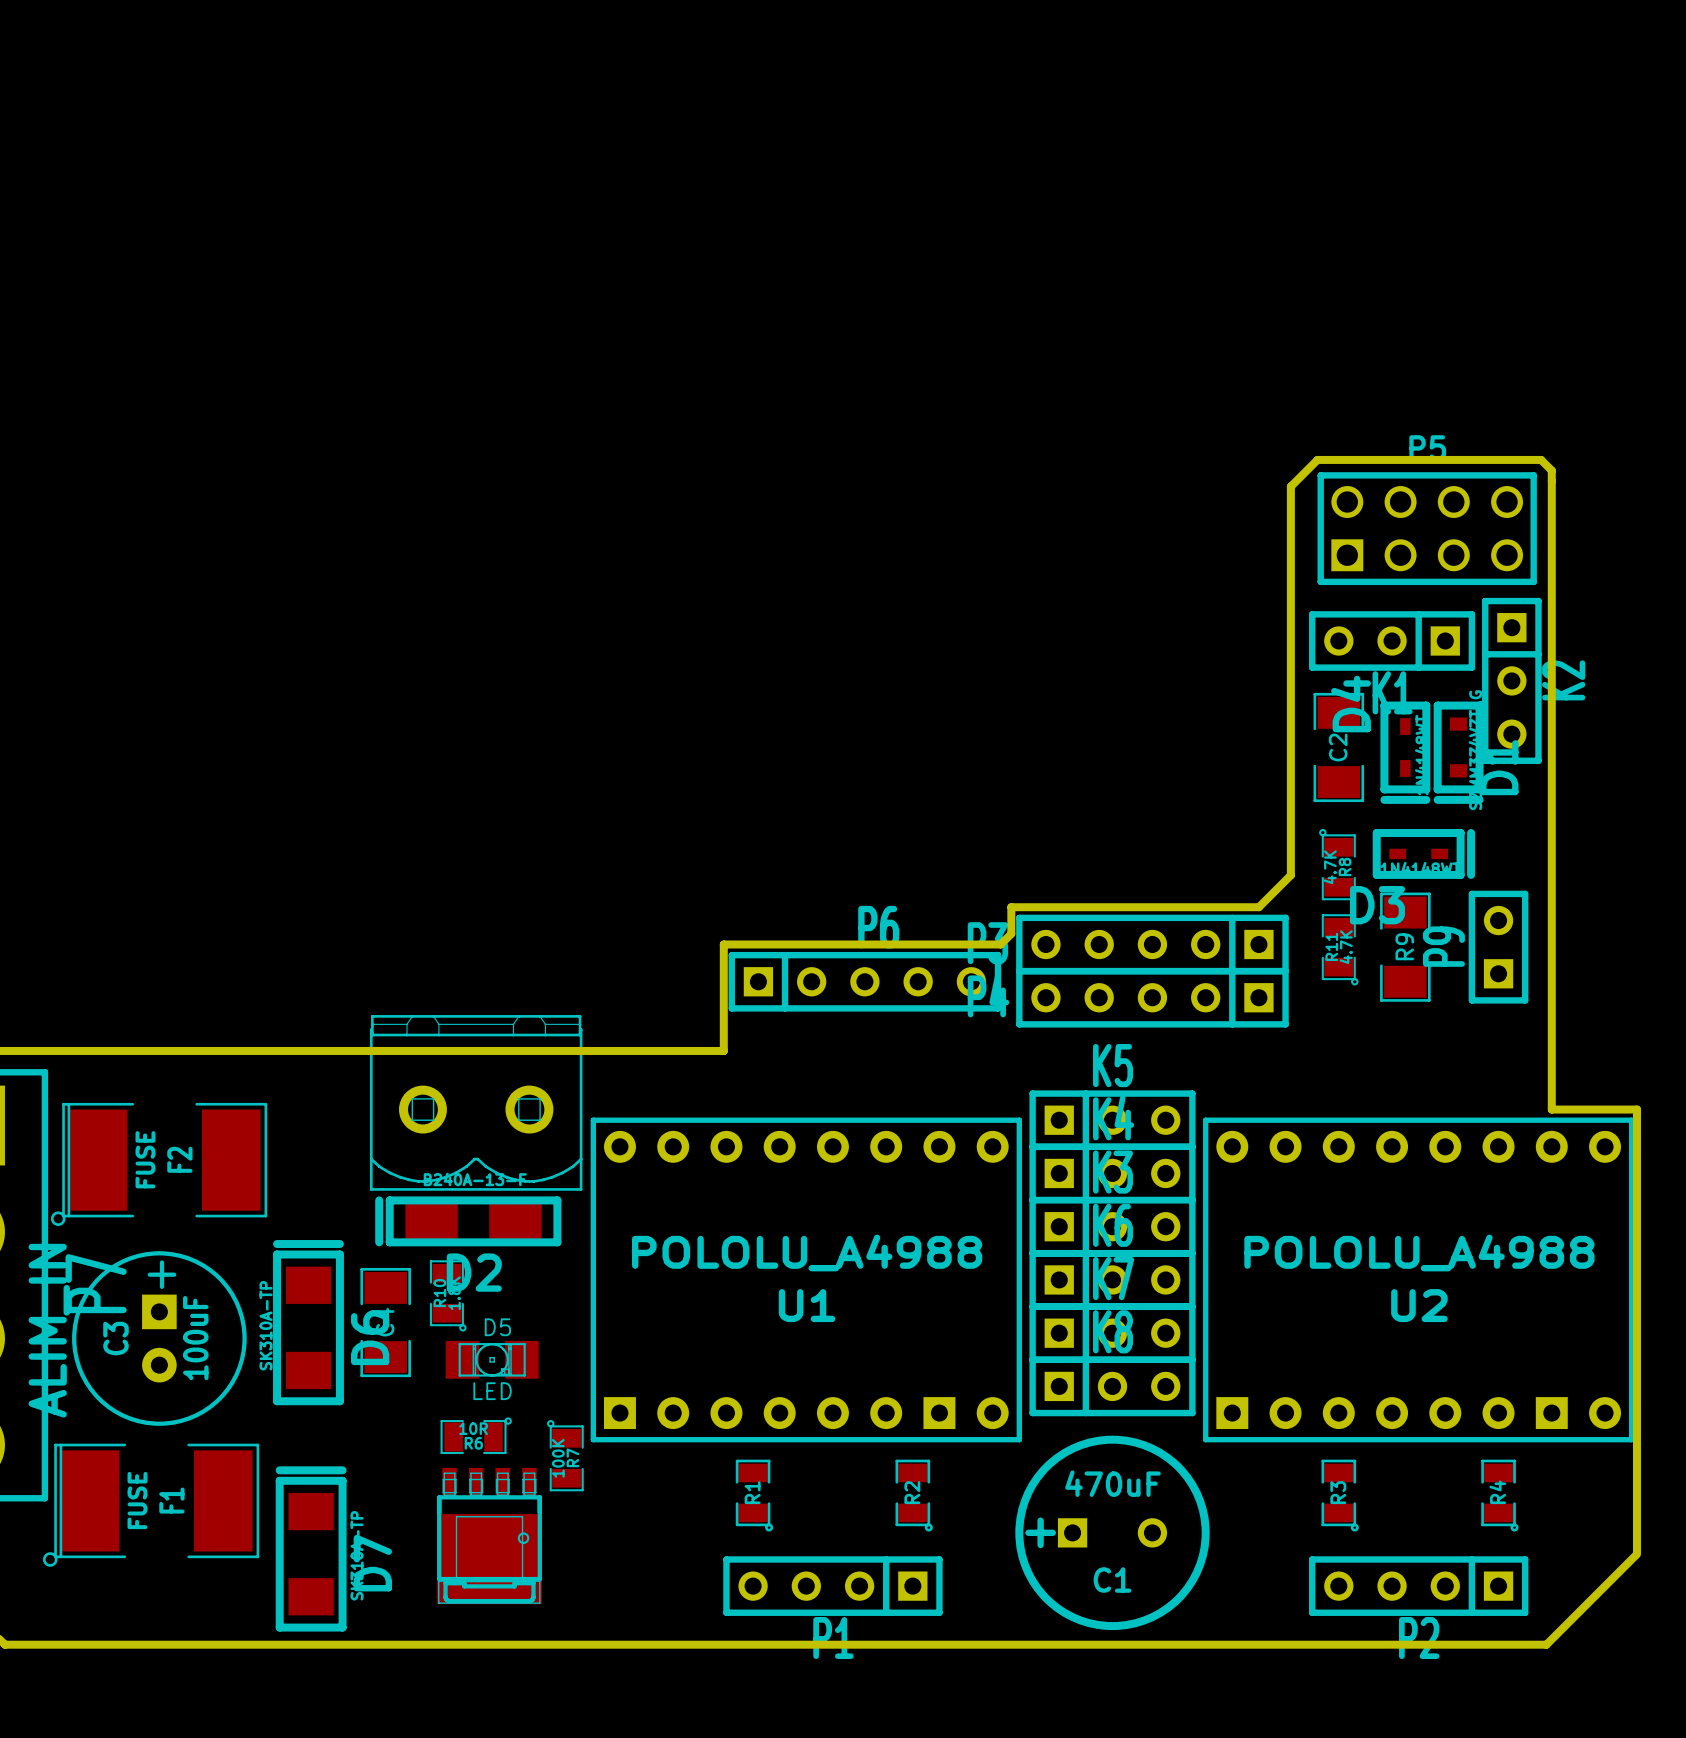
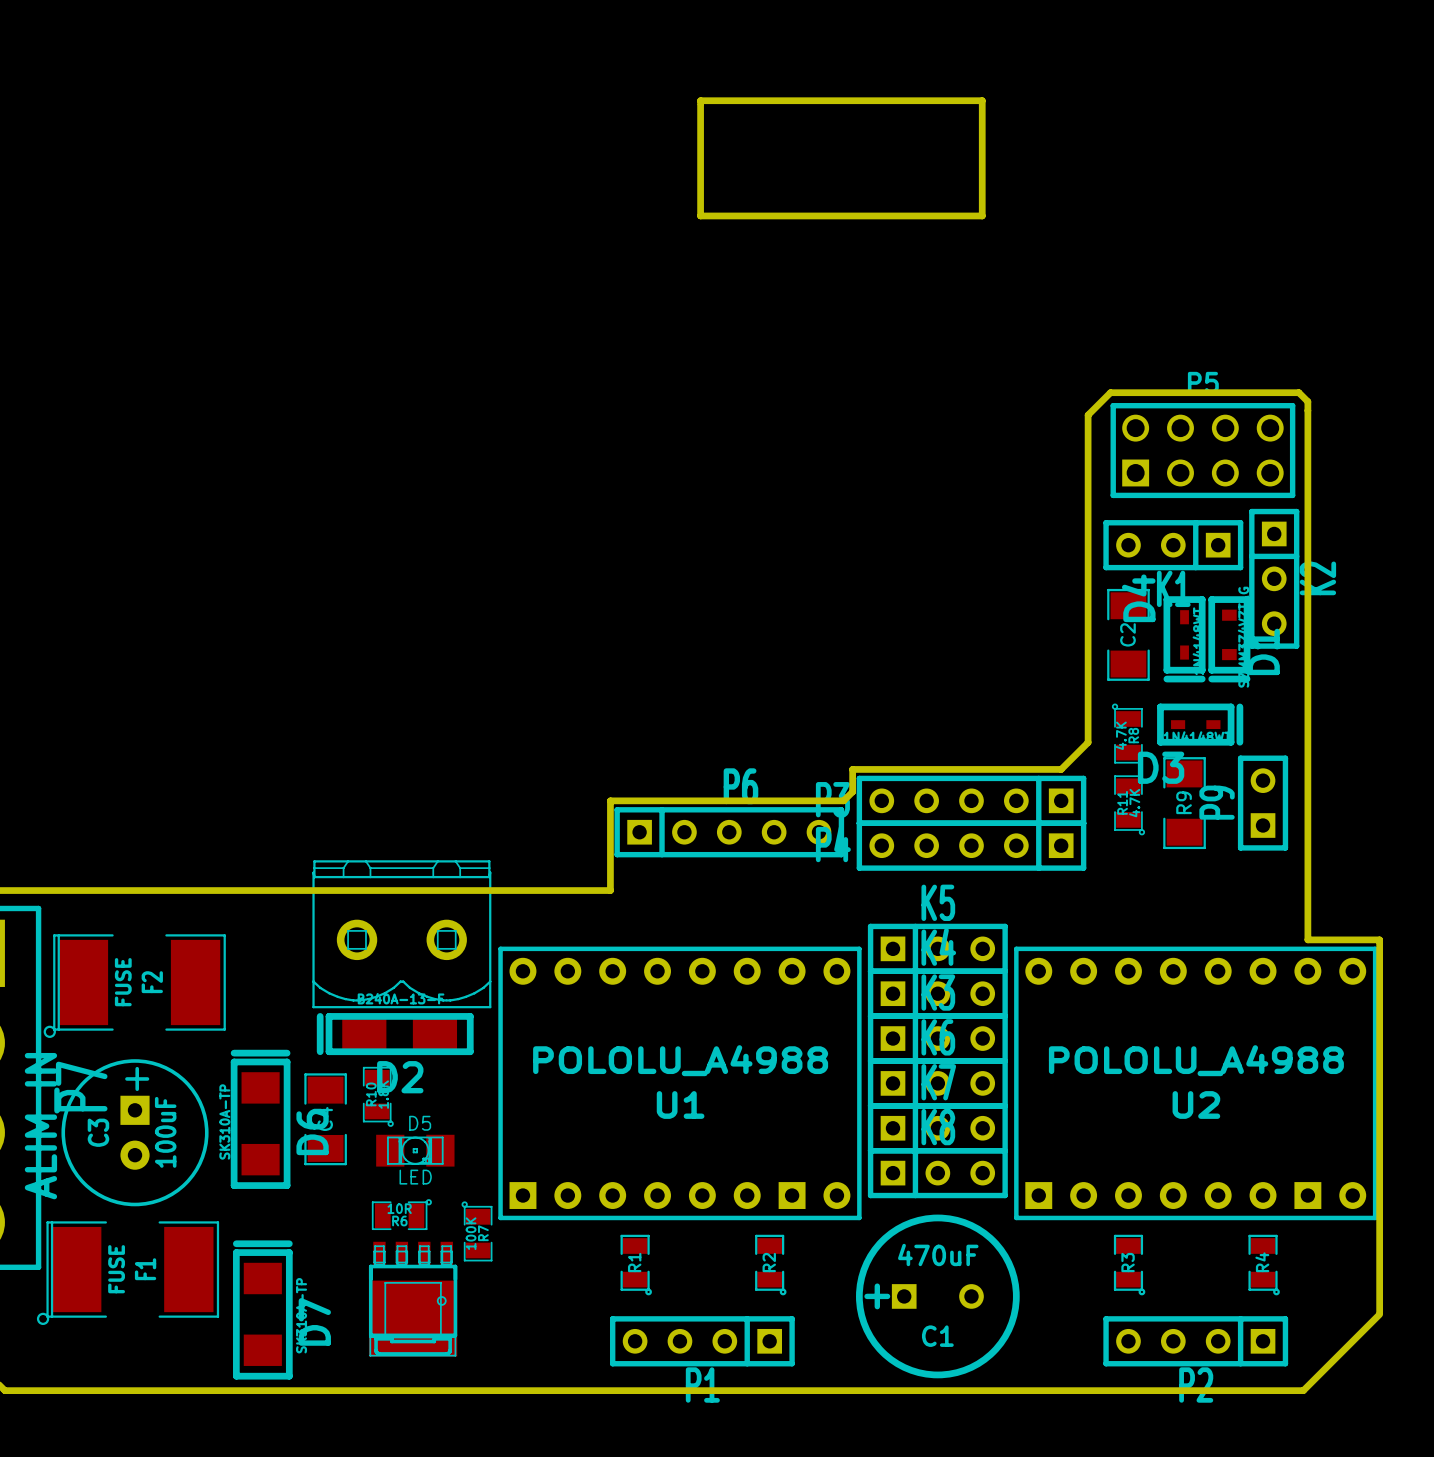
board edge: none -> (700, 103) (700, 100) (982, 100) (982, 215) (700, 215) (700, 105)

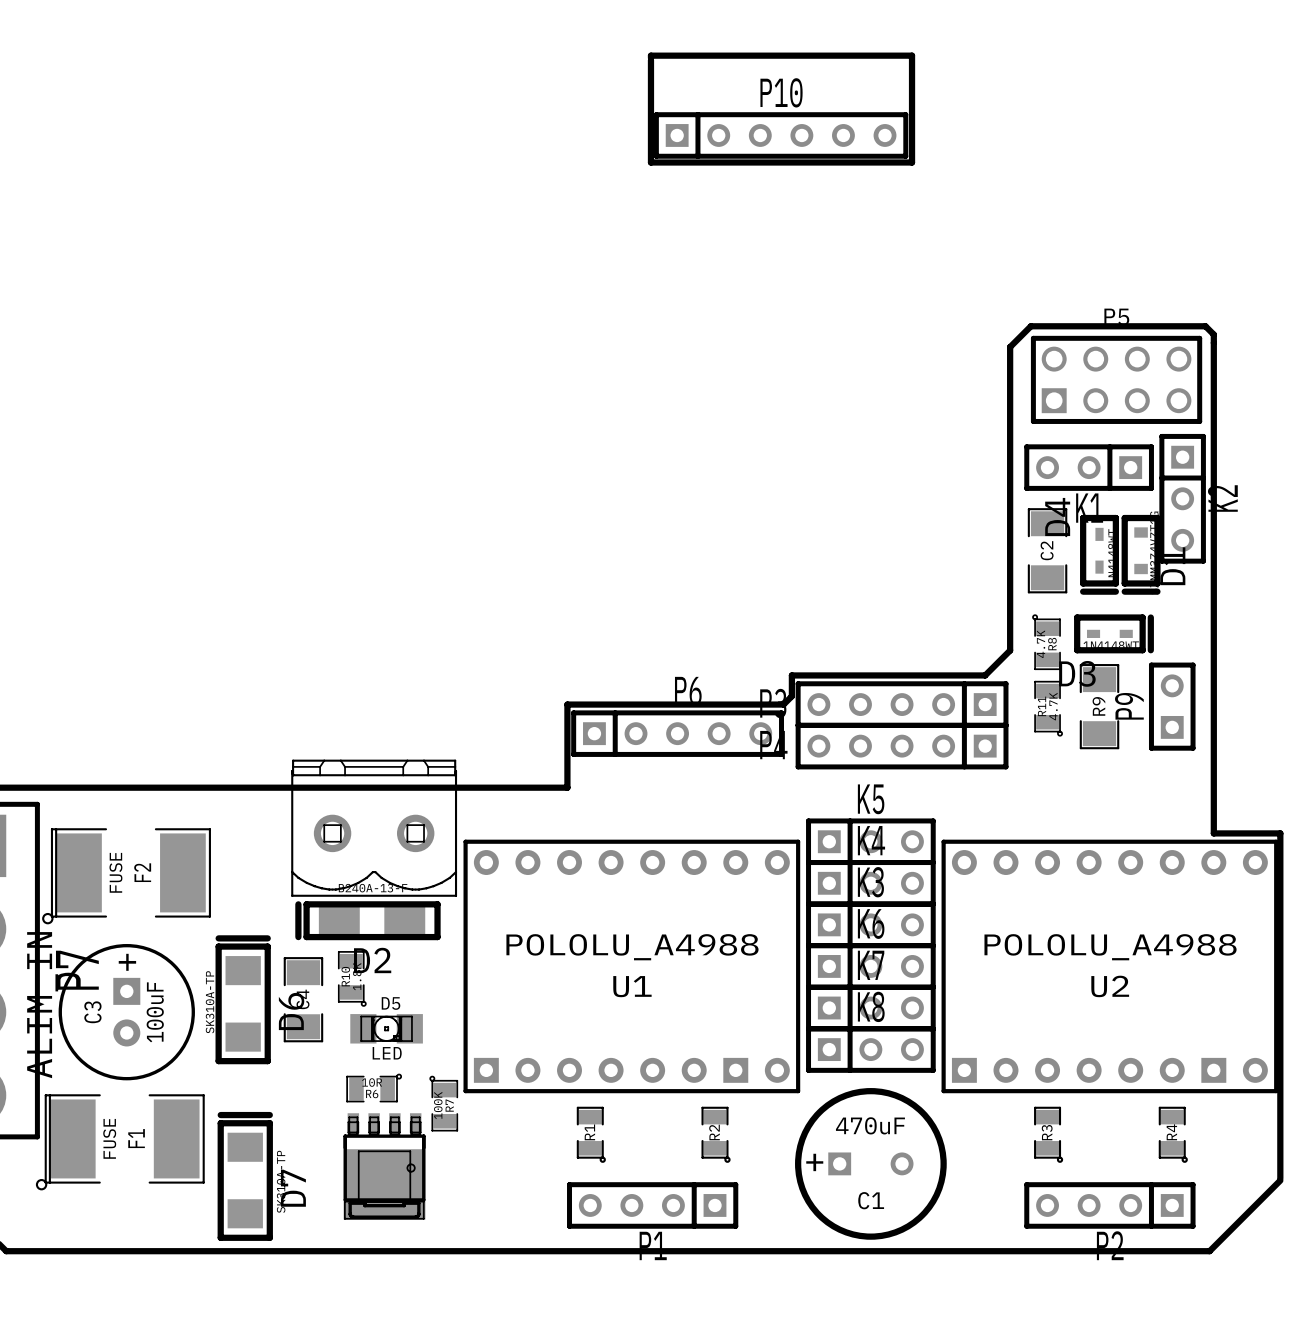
P10: none -> (781, 135)

